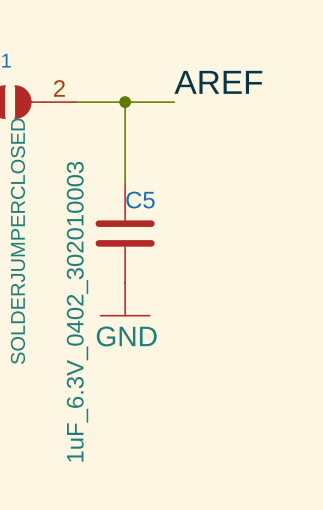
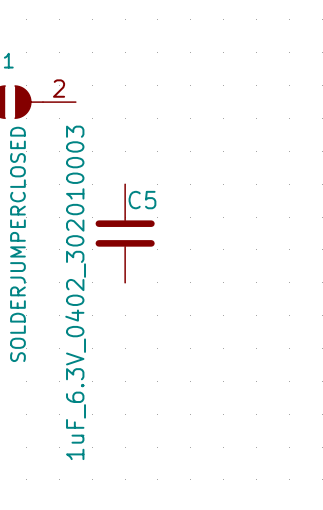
label: AREF (218, 82) -> none
wire: (75, 102) (174, 102) -> none
wire: (125, 102) (125, 184) -> none
junction: (125, 102) -> none
power symbol: GND (125, 299) -> none

